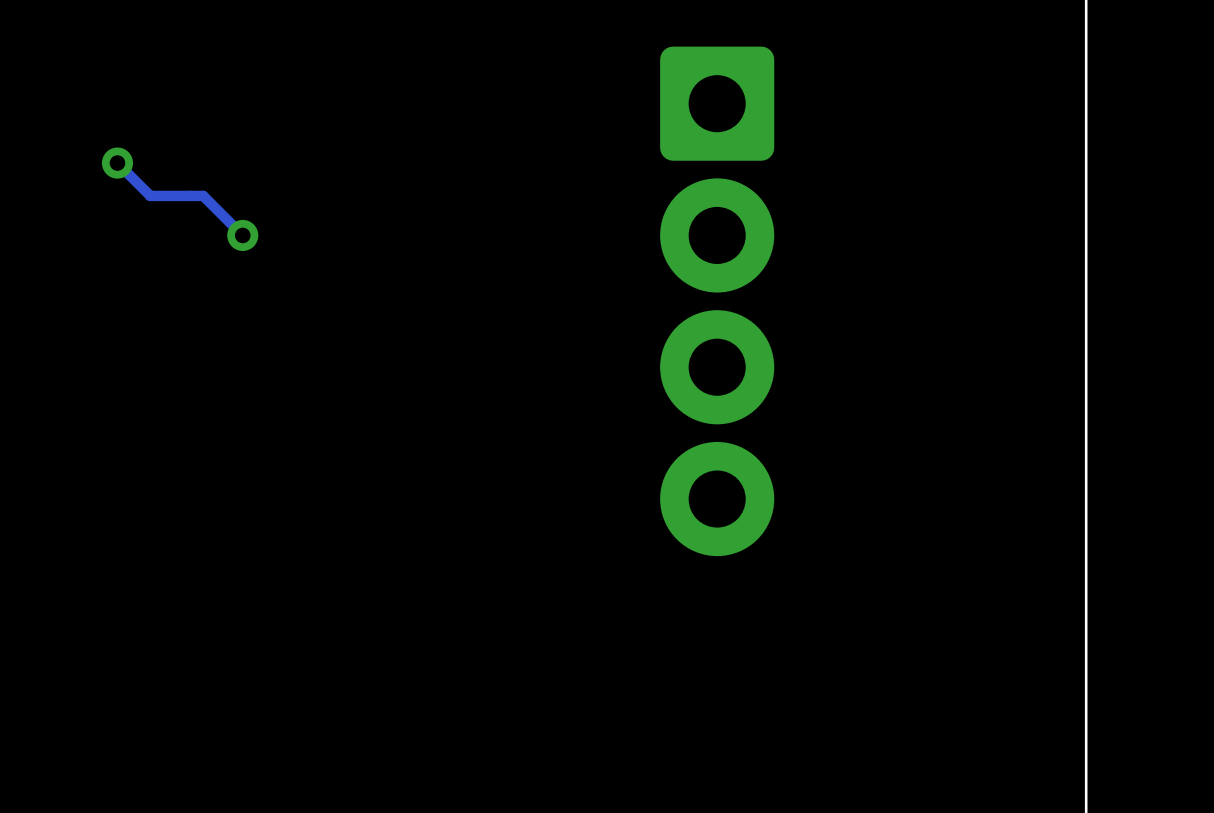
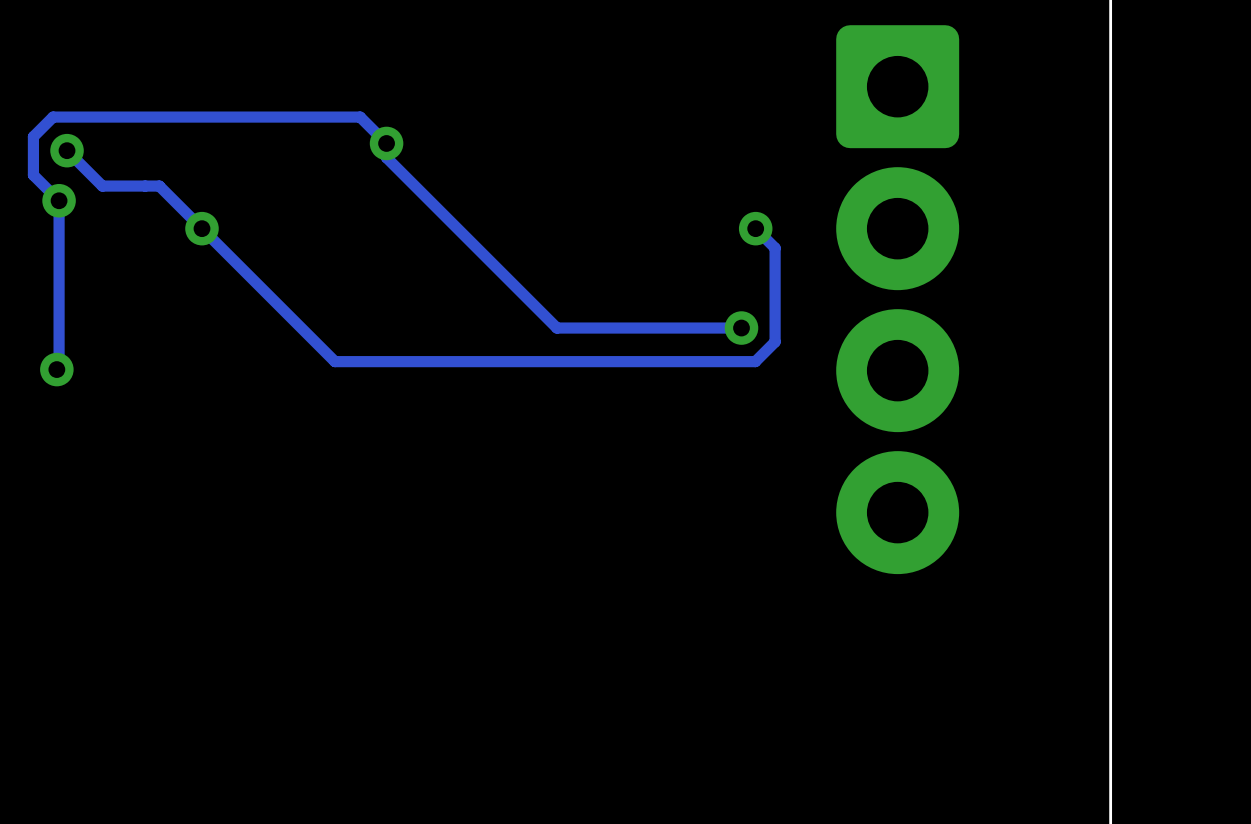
via: none -> (386, 143)
via: none -> (59, 200)
track: none -> (755, 228) (775, 248) (775, 341) (755, 361) (334, 361) (201, 228)
via: none -> (755, 228)
part position: (717, 301) -> (897, 299)
track: none -> (741, 328) (556, 328) (386, 157) (386, 143) (360, 117) (53, 117) (33, 136) (33, 175) (59, 200) (59, 367) (56, 369)
via: none -> (741, 328)
via: none -> (56, 369)

